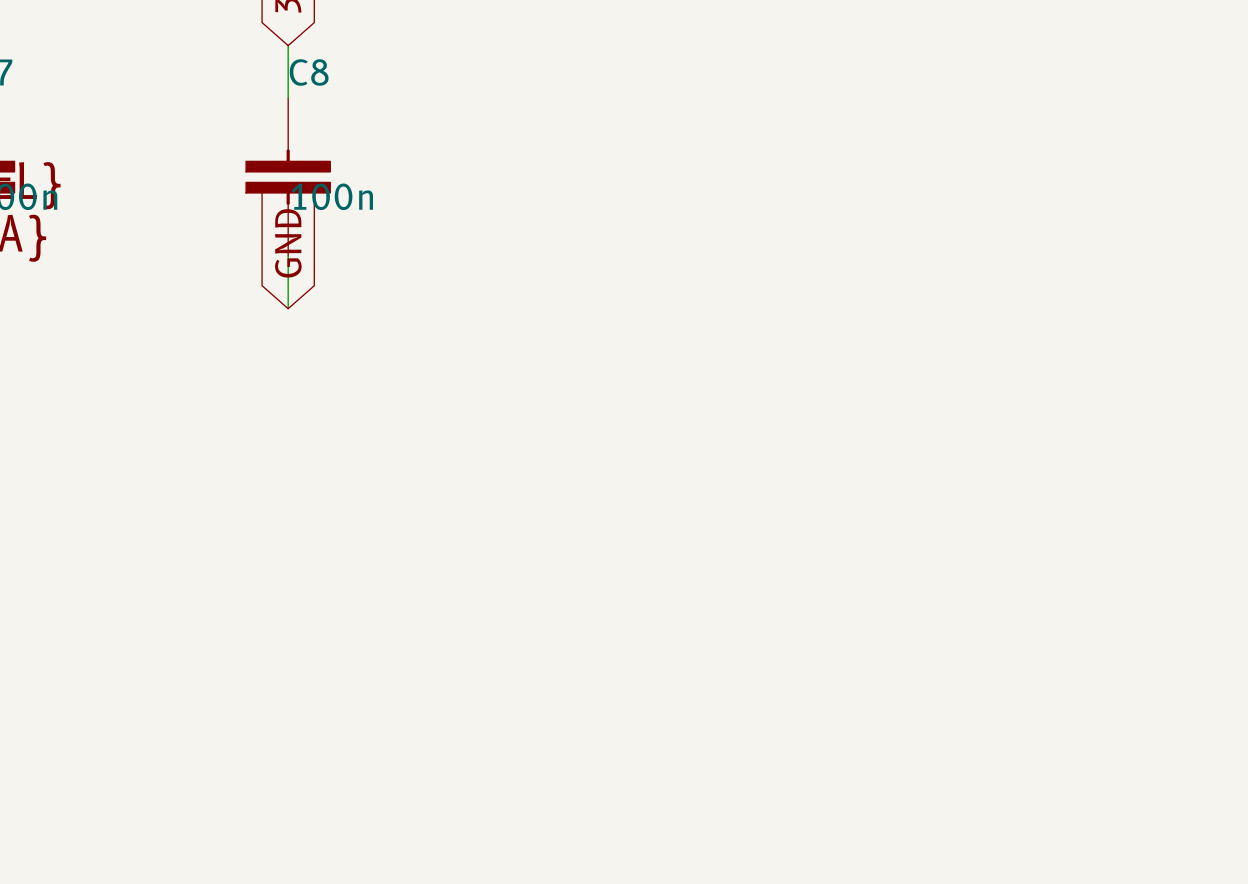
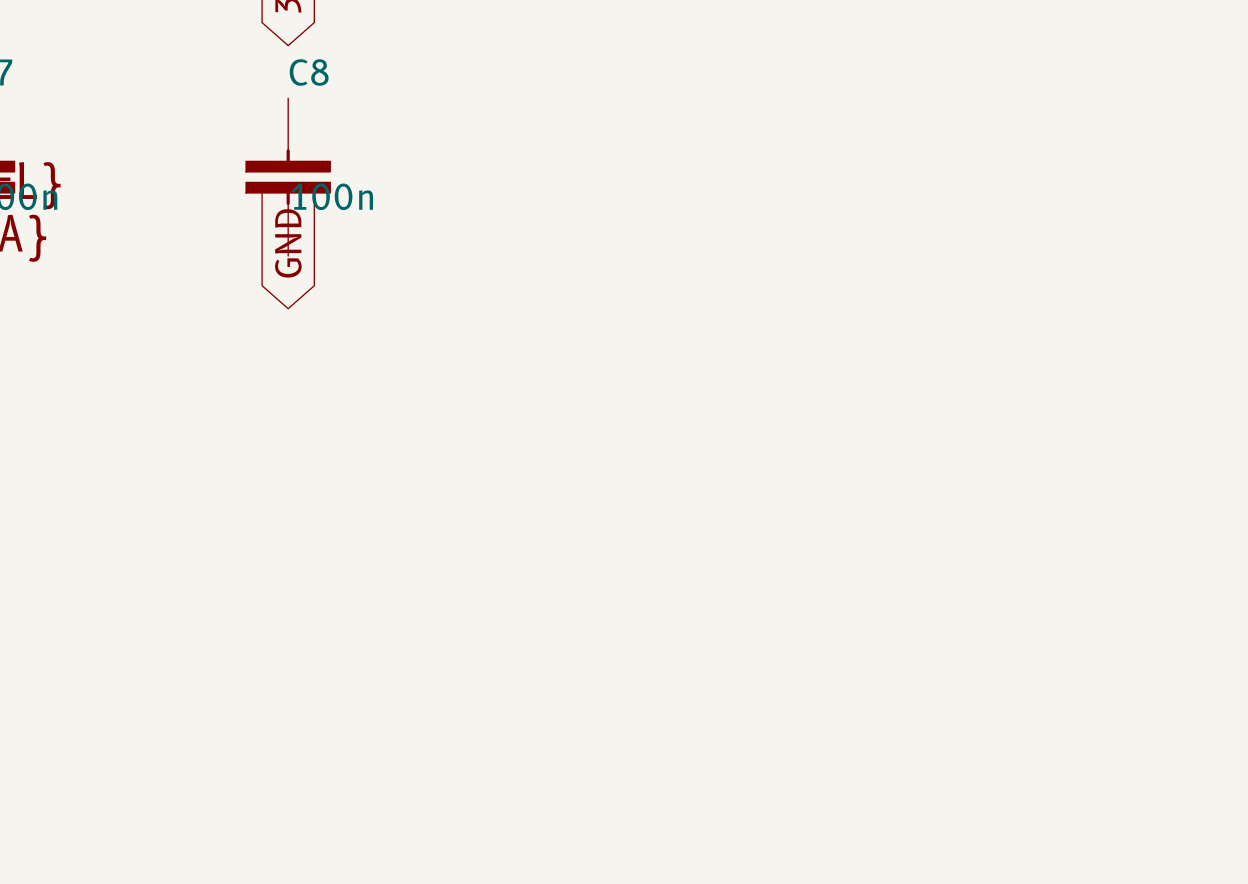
wire: (288, 45) (288, 98) -> none
wire: (288, 256) (288, 308) -> none

